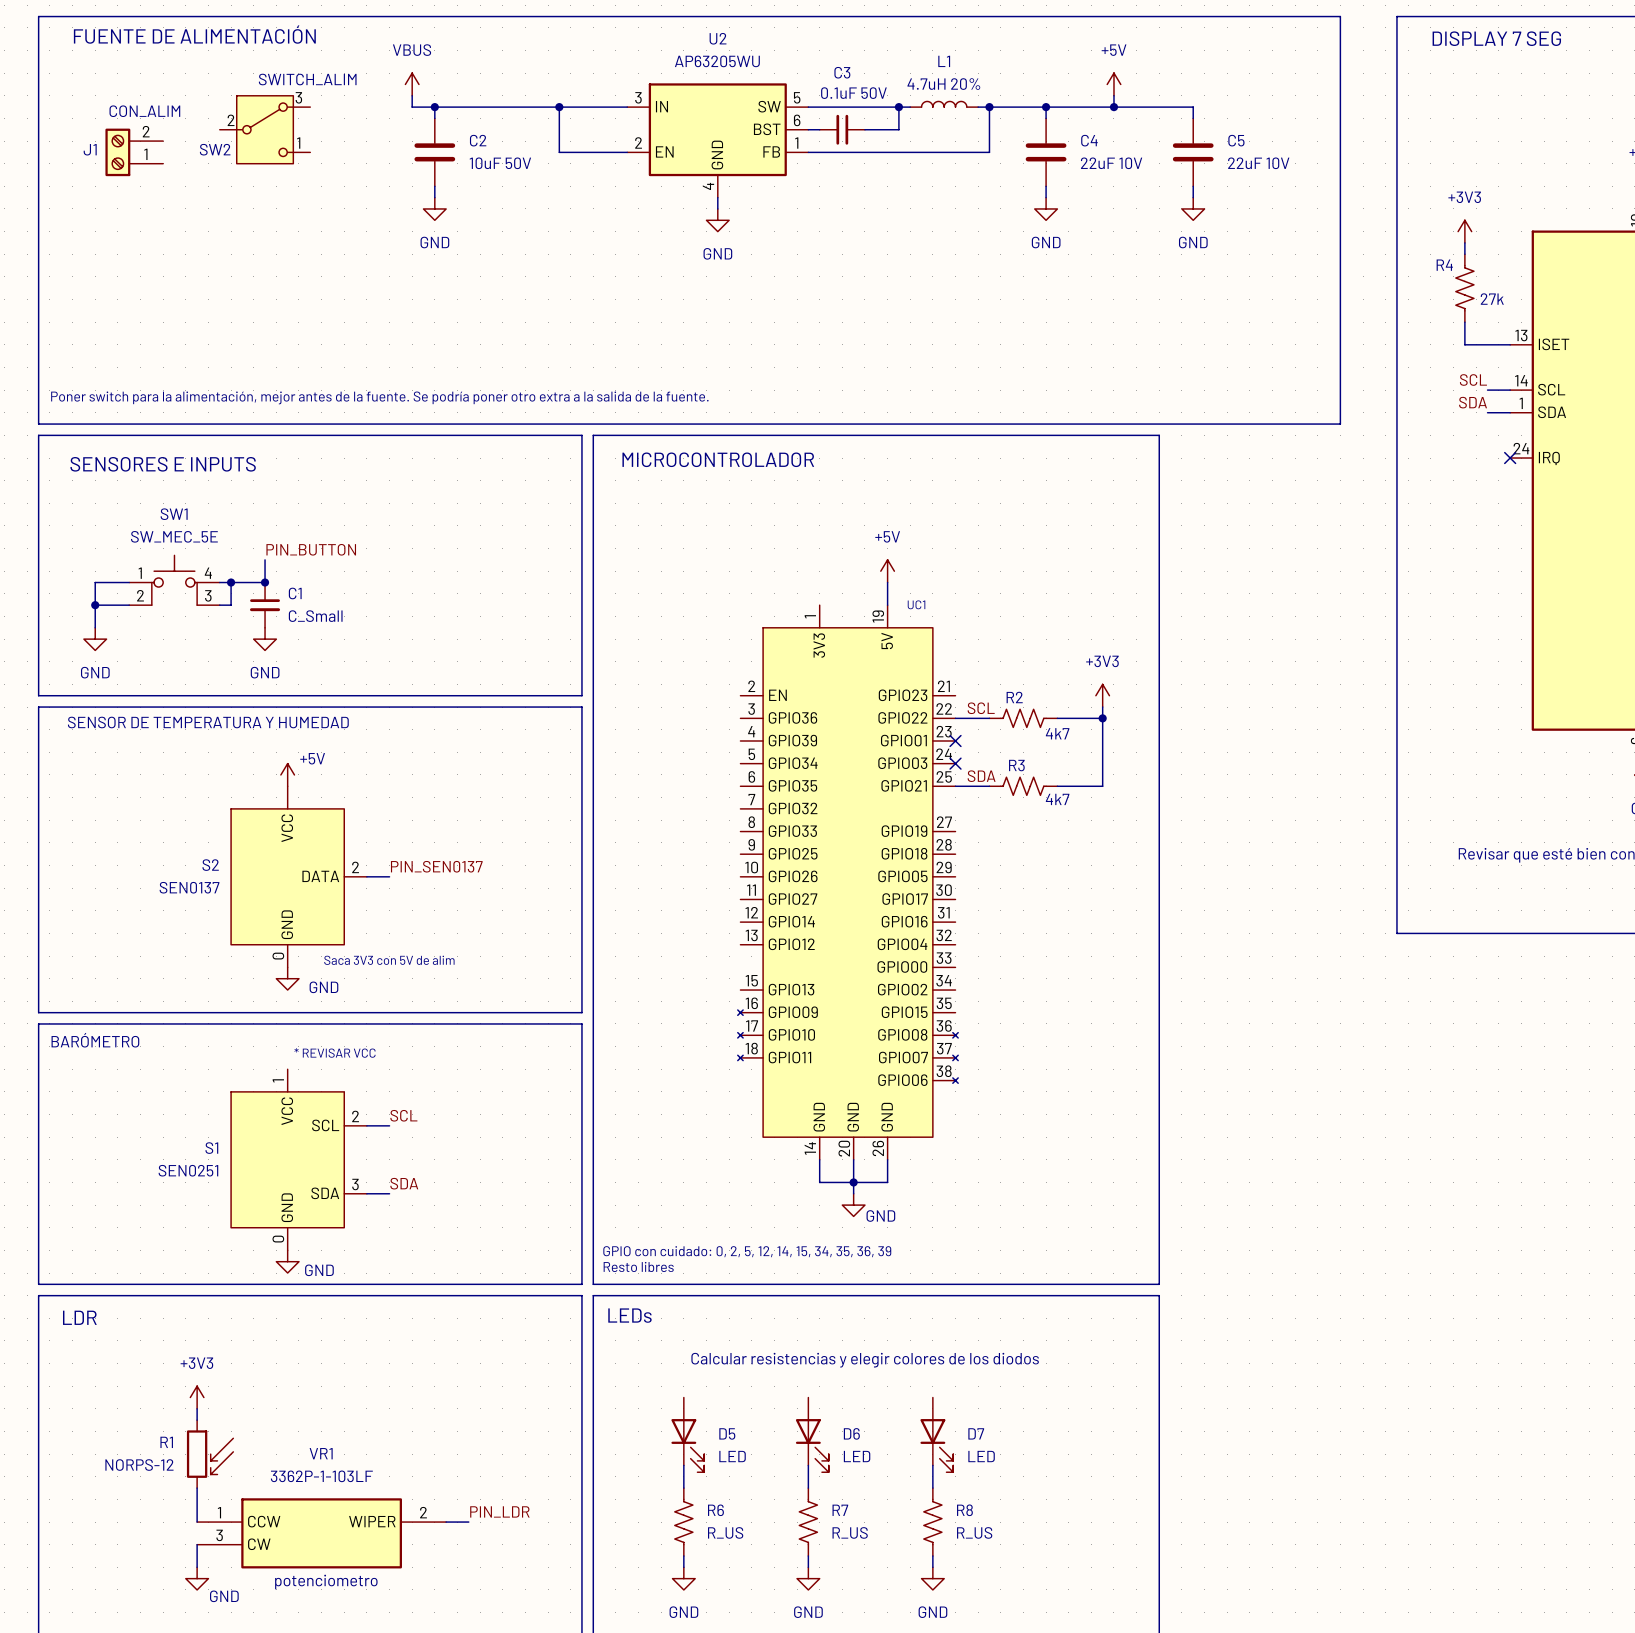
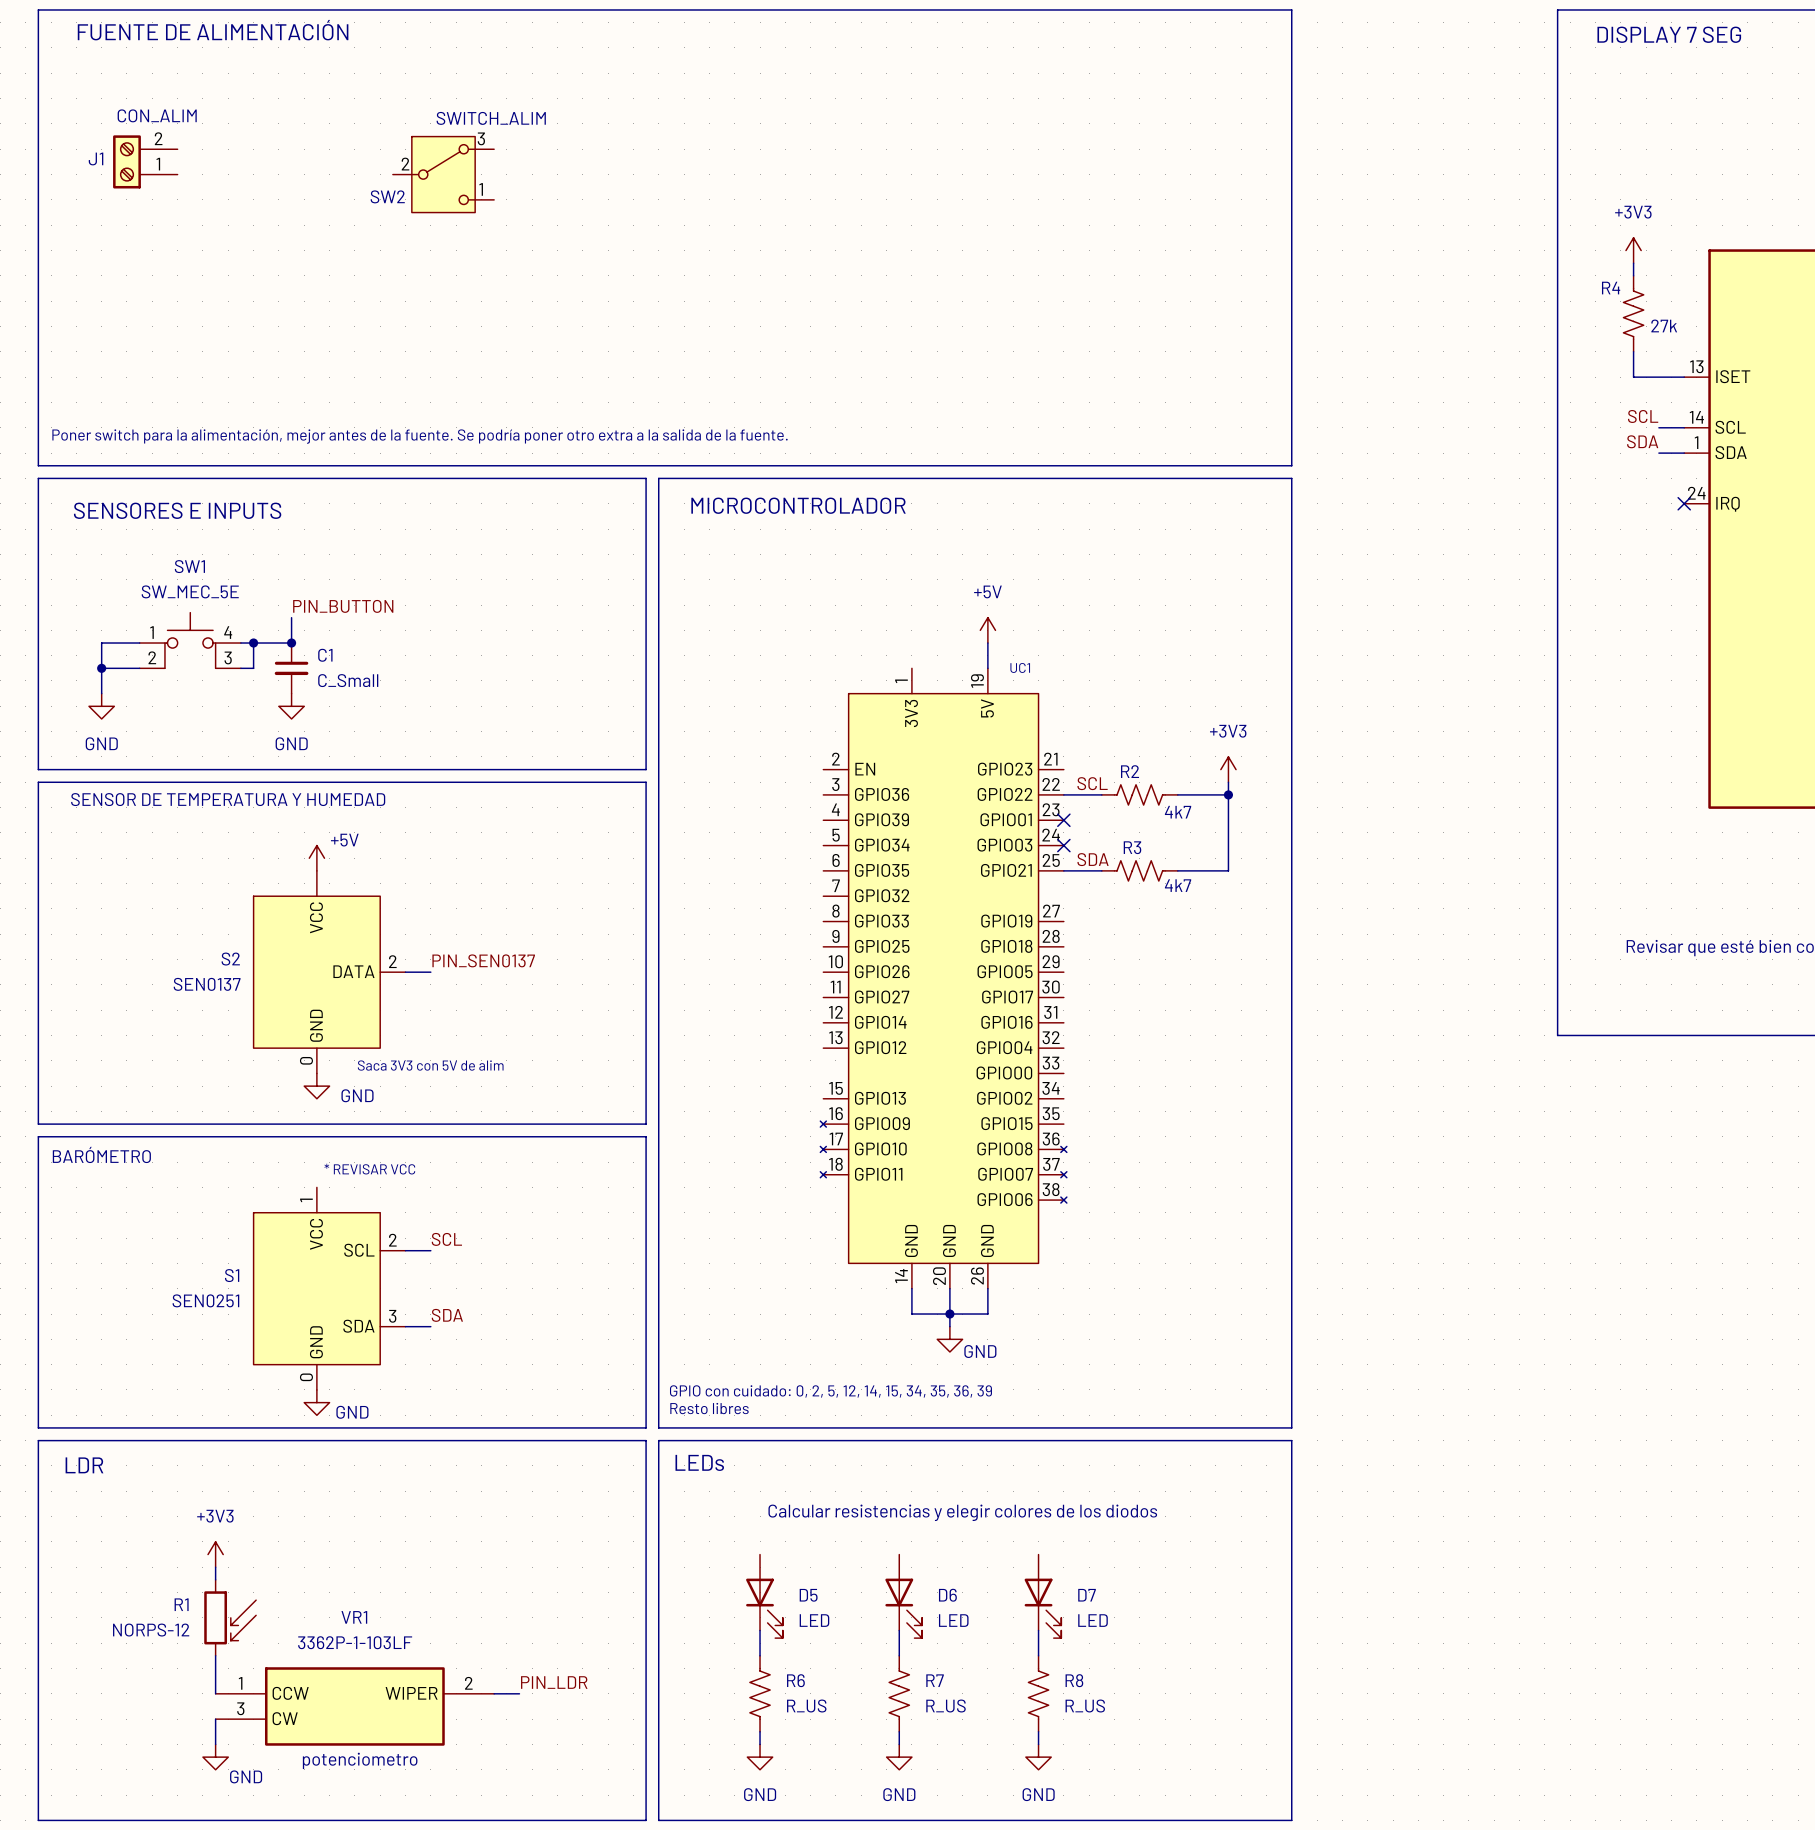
line: (1159, 16) (1340, 16) (1340, 424) (1159, 424) -> (1291, 9) (1291, 465)
power symbol: VBUS (412, 84) -> none
power symbol: +5V (1113, 84) -> none
wire: (412, 95) (412, 107) (627, 107) -> none
wire: (1113, 95) (1113, 107) -> none
L1: 4.7uH 20% (944, 104) -> none
wire: (434, 107) (434, 118) -> none
junction: (434, 107) -> none
wire: (559, 107) (559, 152) (627, 152) -> none
junction: (559, 107) -> none
wire: (808, 107) (910, 107) -> none
wire: (898, 107) (898, 129) (864, 129) -> none
junction: (898, 107) -> none
wire: (978, 107) (1193, 107) (1193, 118) -> none
wire: (989, 107) (989, 152) (808, 152) -> none
junction: (989, 107) -> none
wire: (1046, 107) (1046, 118) -> none
junction: (1046, 107) -> none
junction: (1113, 107) -> none
SW2 position: (265, 129) -> (443, 174)
wire: (808, 129) (819, 129) -> none
C3: 0.1uF 50V (842, 129) -> none
U2: AP63205WU (717, 140) -> none
C2: 10uF 50V (434, 152) -> none
C4: 22uF 10V (1046, 152) -> none
C5: 22uF 10V (1193, 152) -> none
wire: (434, 186) (434, 197) -> none
wire: (1046, 186) (1046, 197) -> none
wire: (1193, 186) (1193, 197) -> none
wire: (717, 197) (717, 208) -> none
power symbol: GND (434, 208) -> none
power symbol: GND (1046, 208) -> none
power symbol: GND (1193, 208) -> none
power symbol: GND (717, 220) -> none

